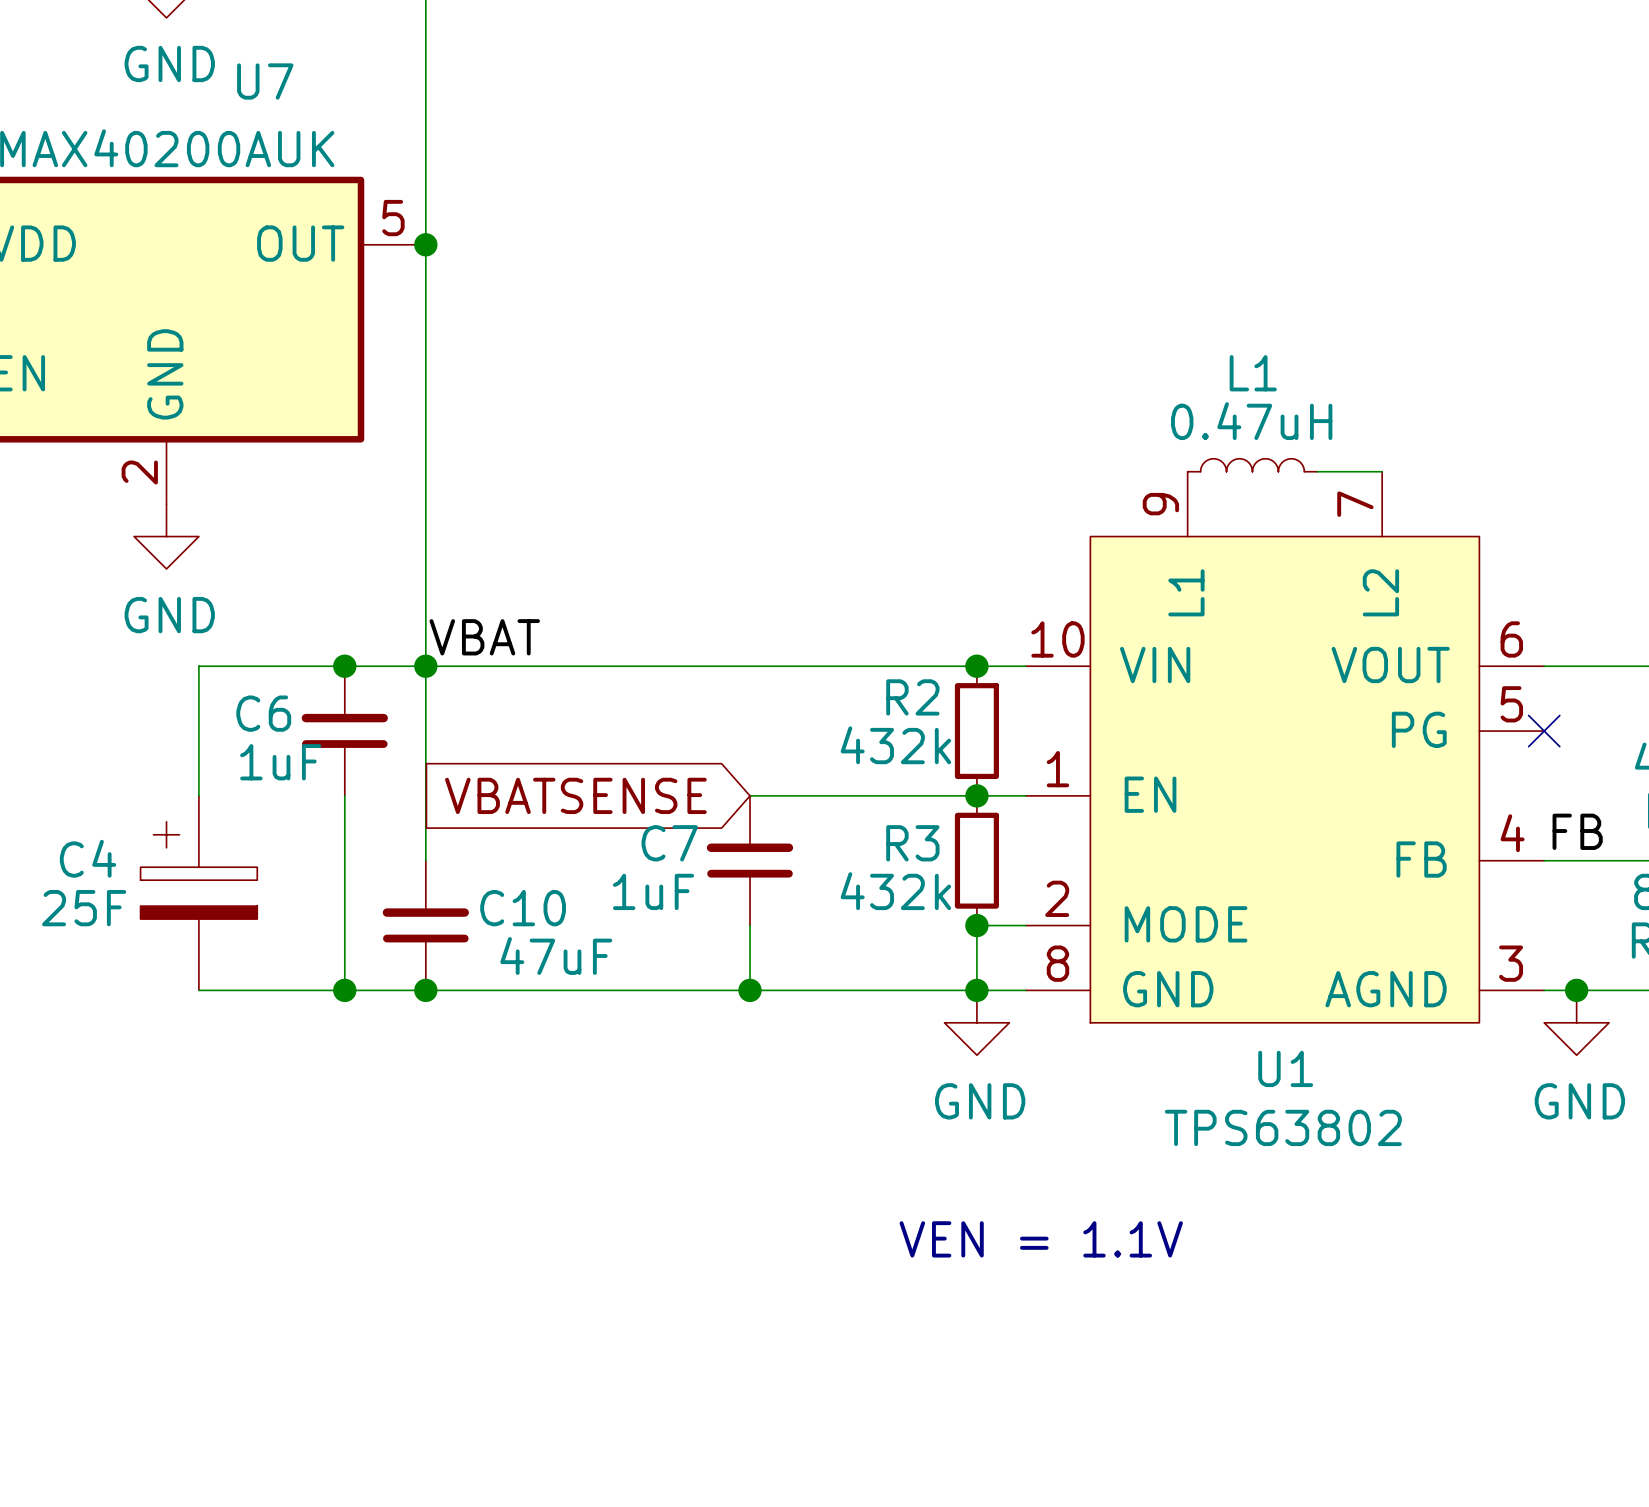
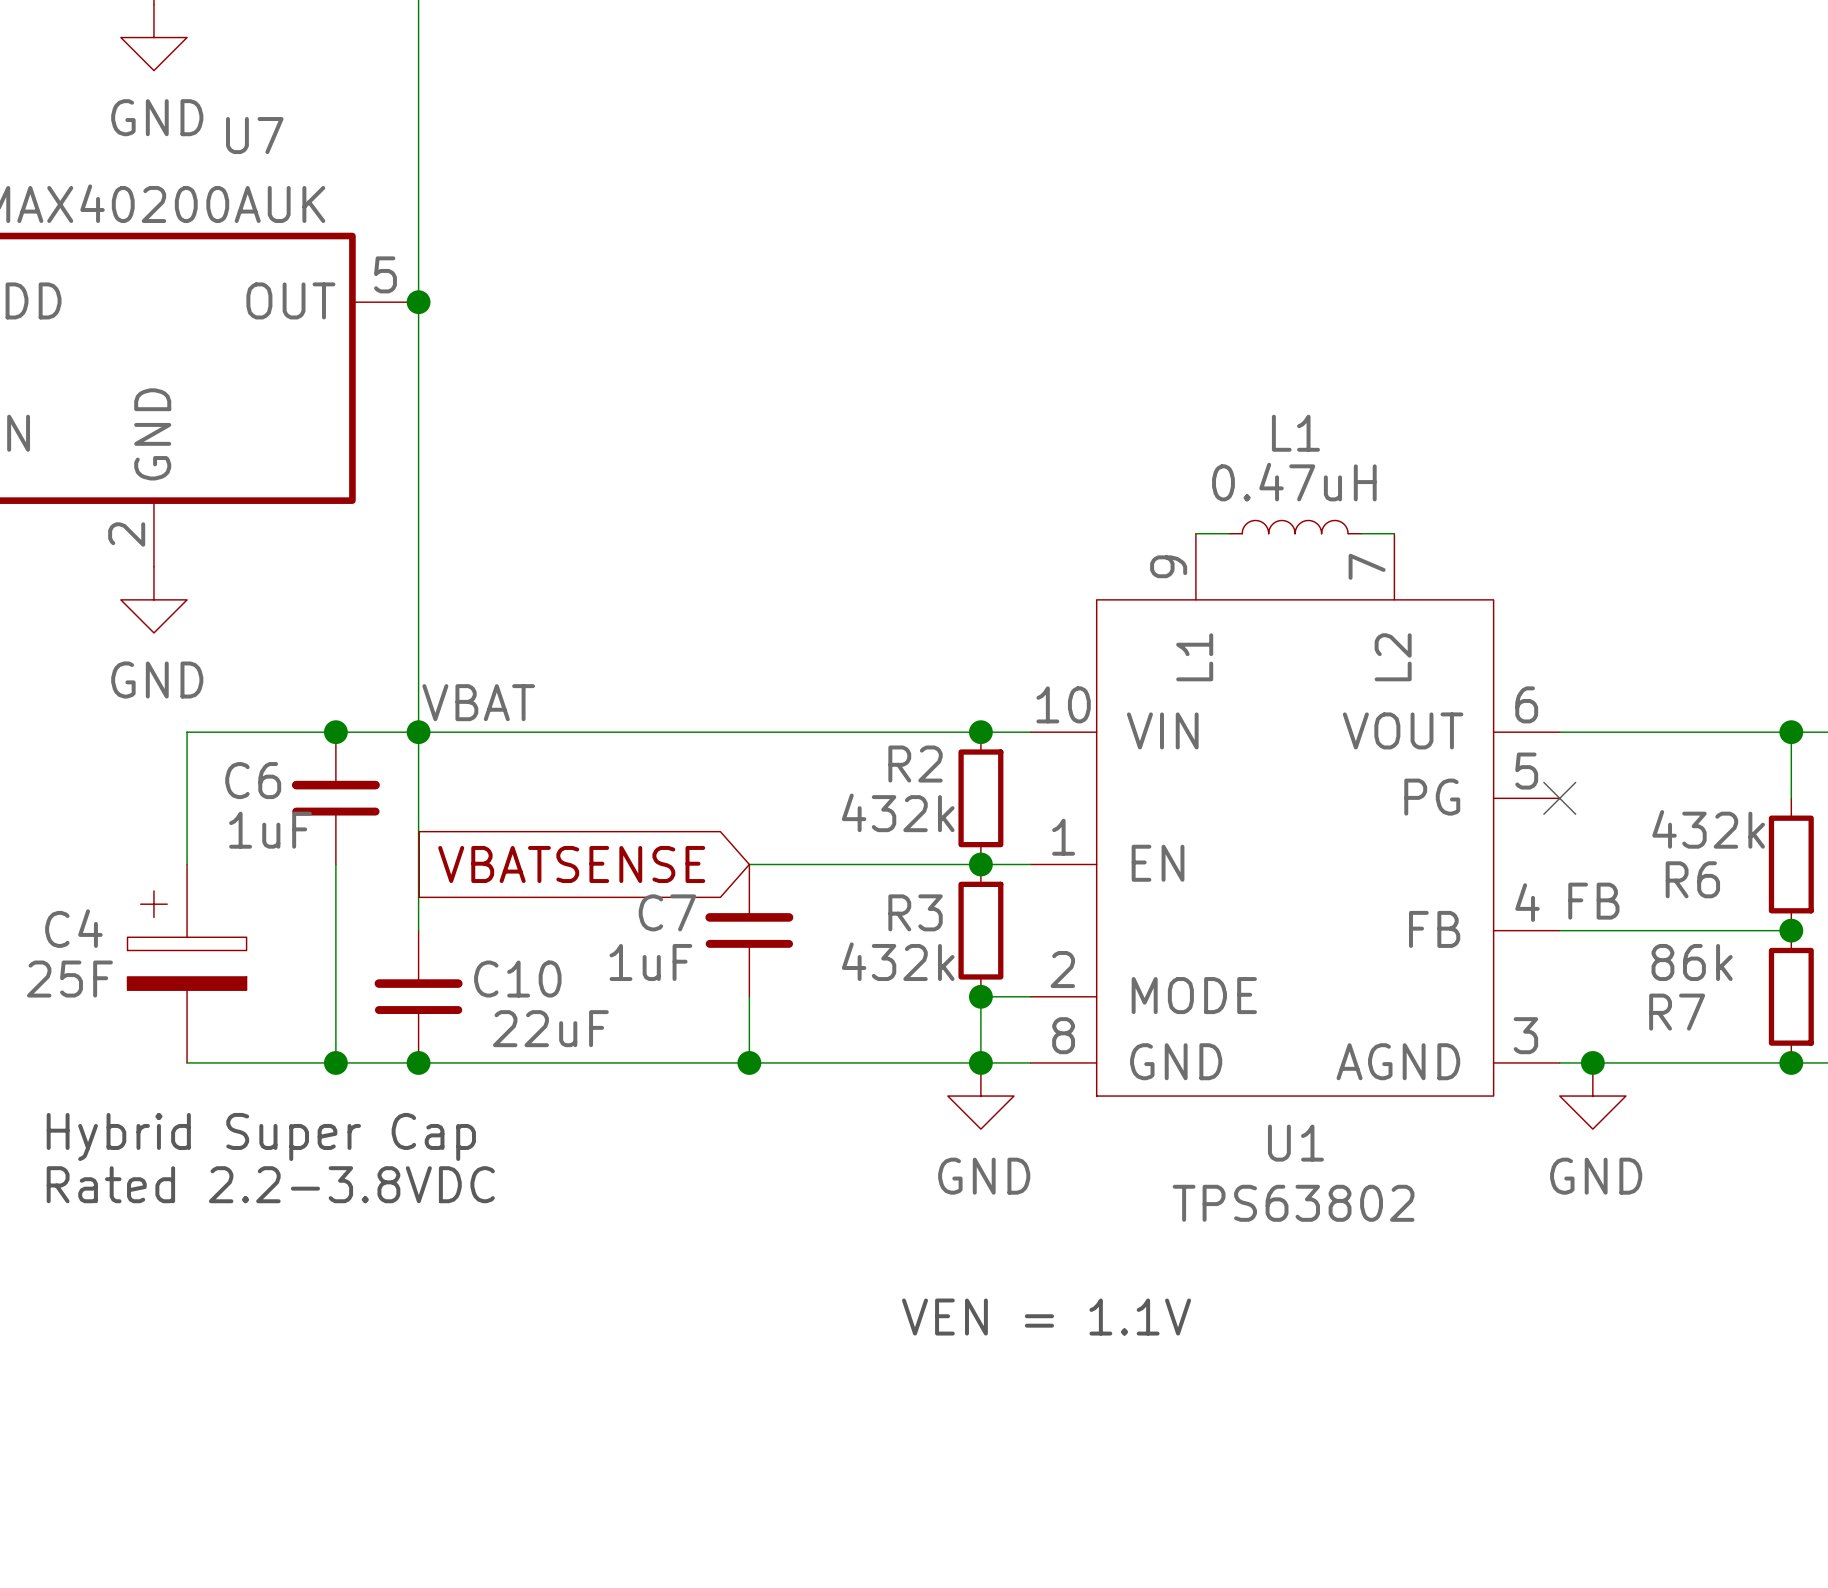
L1 position: (1252, 465) -> (1295, 527)
wire: (1317, 471) (1349, 471) -> (1195, 533) (1228, 533)
C10 value: 47uF (556, 955) -> 22uF (550, 1028)
text: none -> Hybrid Super Cap (261, 1136)
text: none -> Rated 2.2-3.8VDC (270, 1184)

